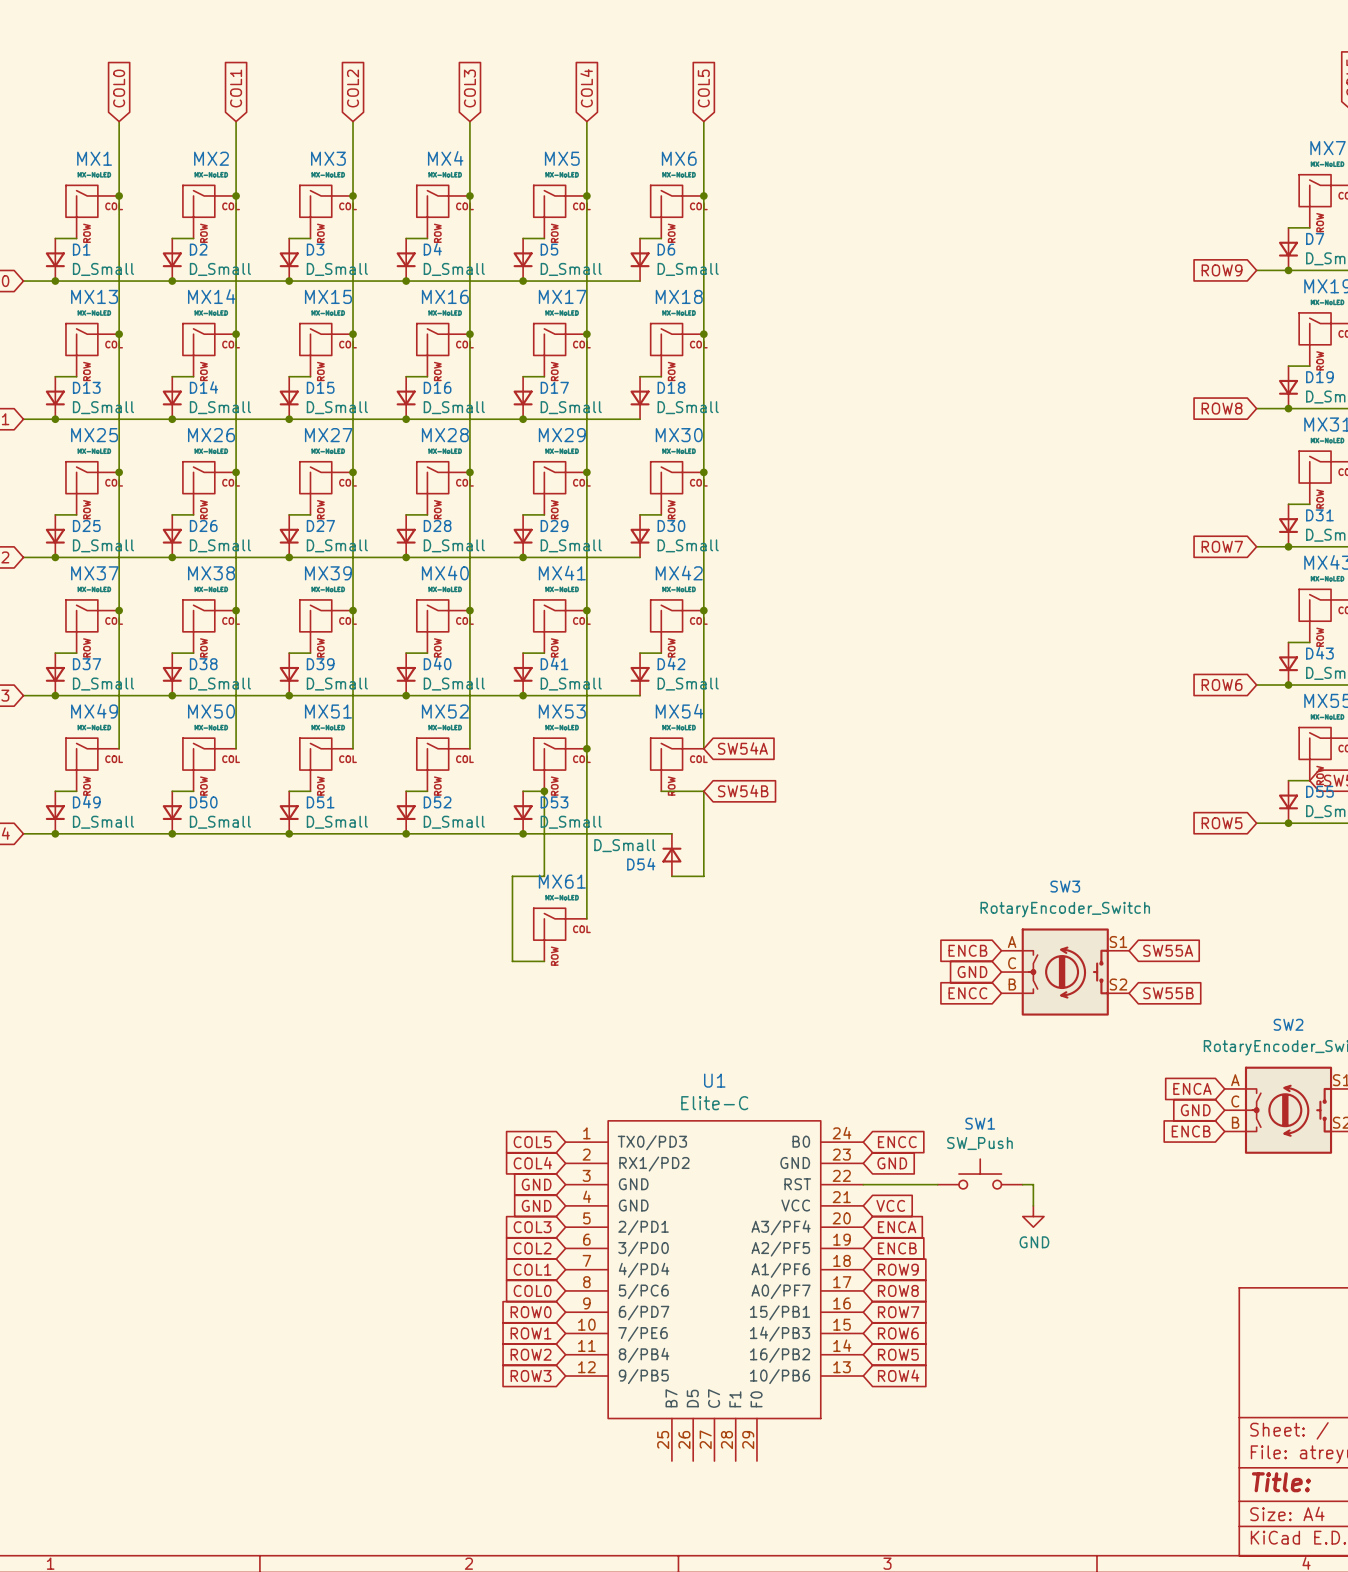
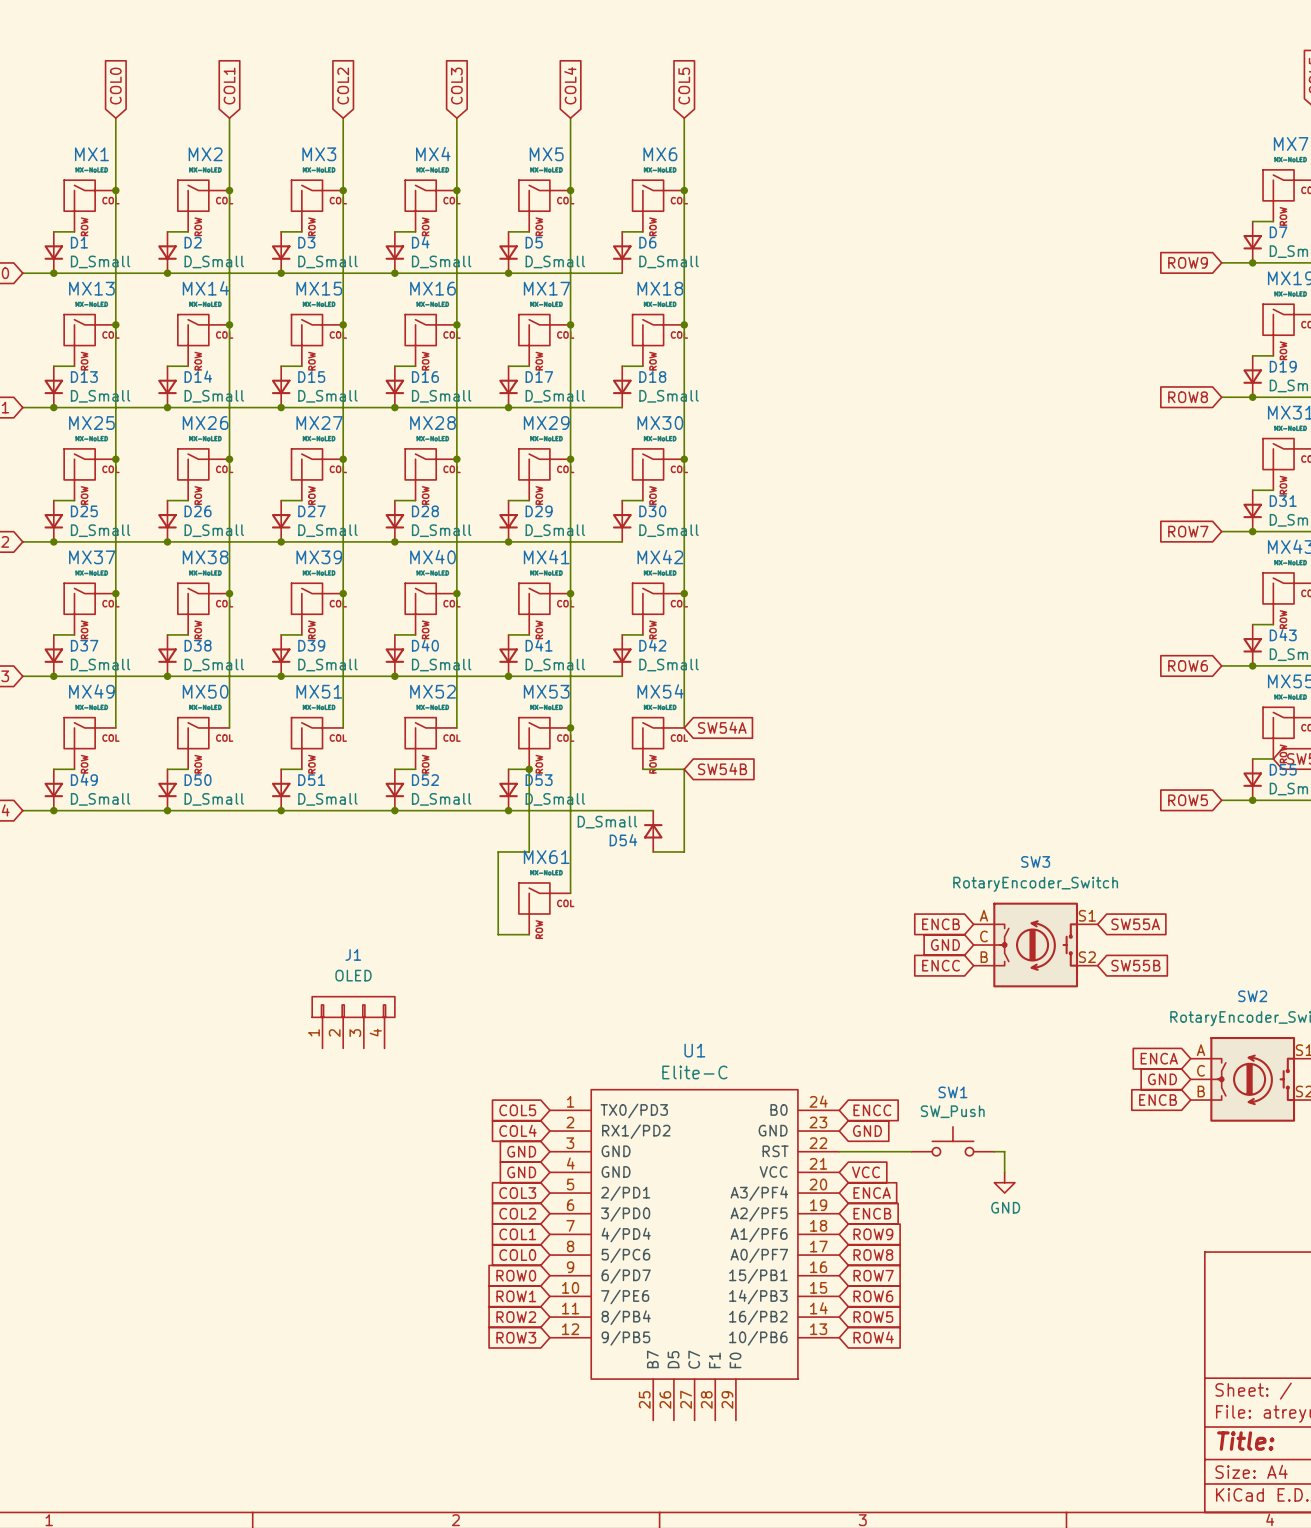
J1: none -> OLED (353, 1022)

